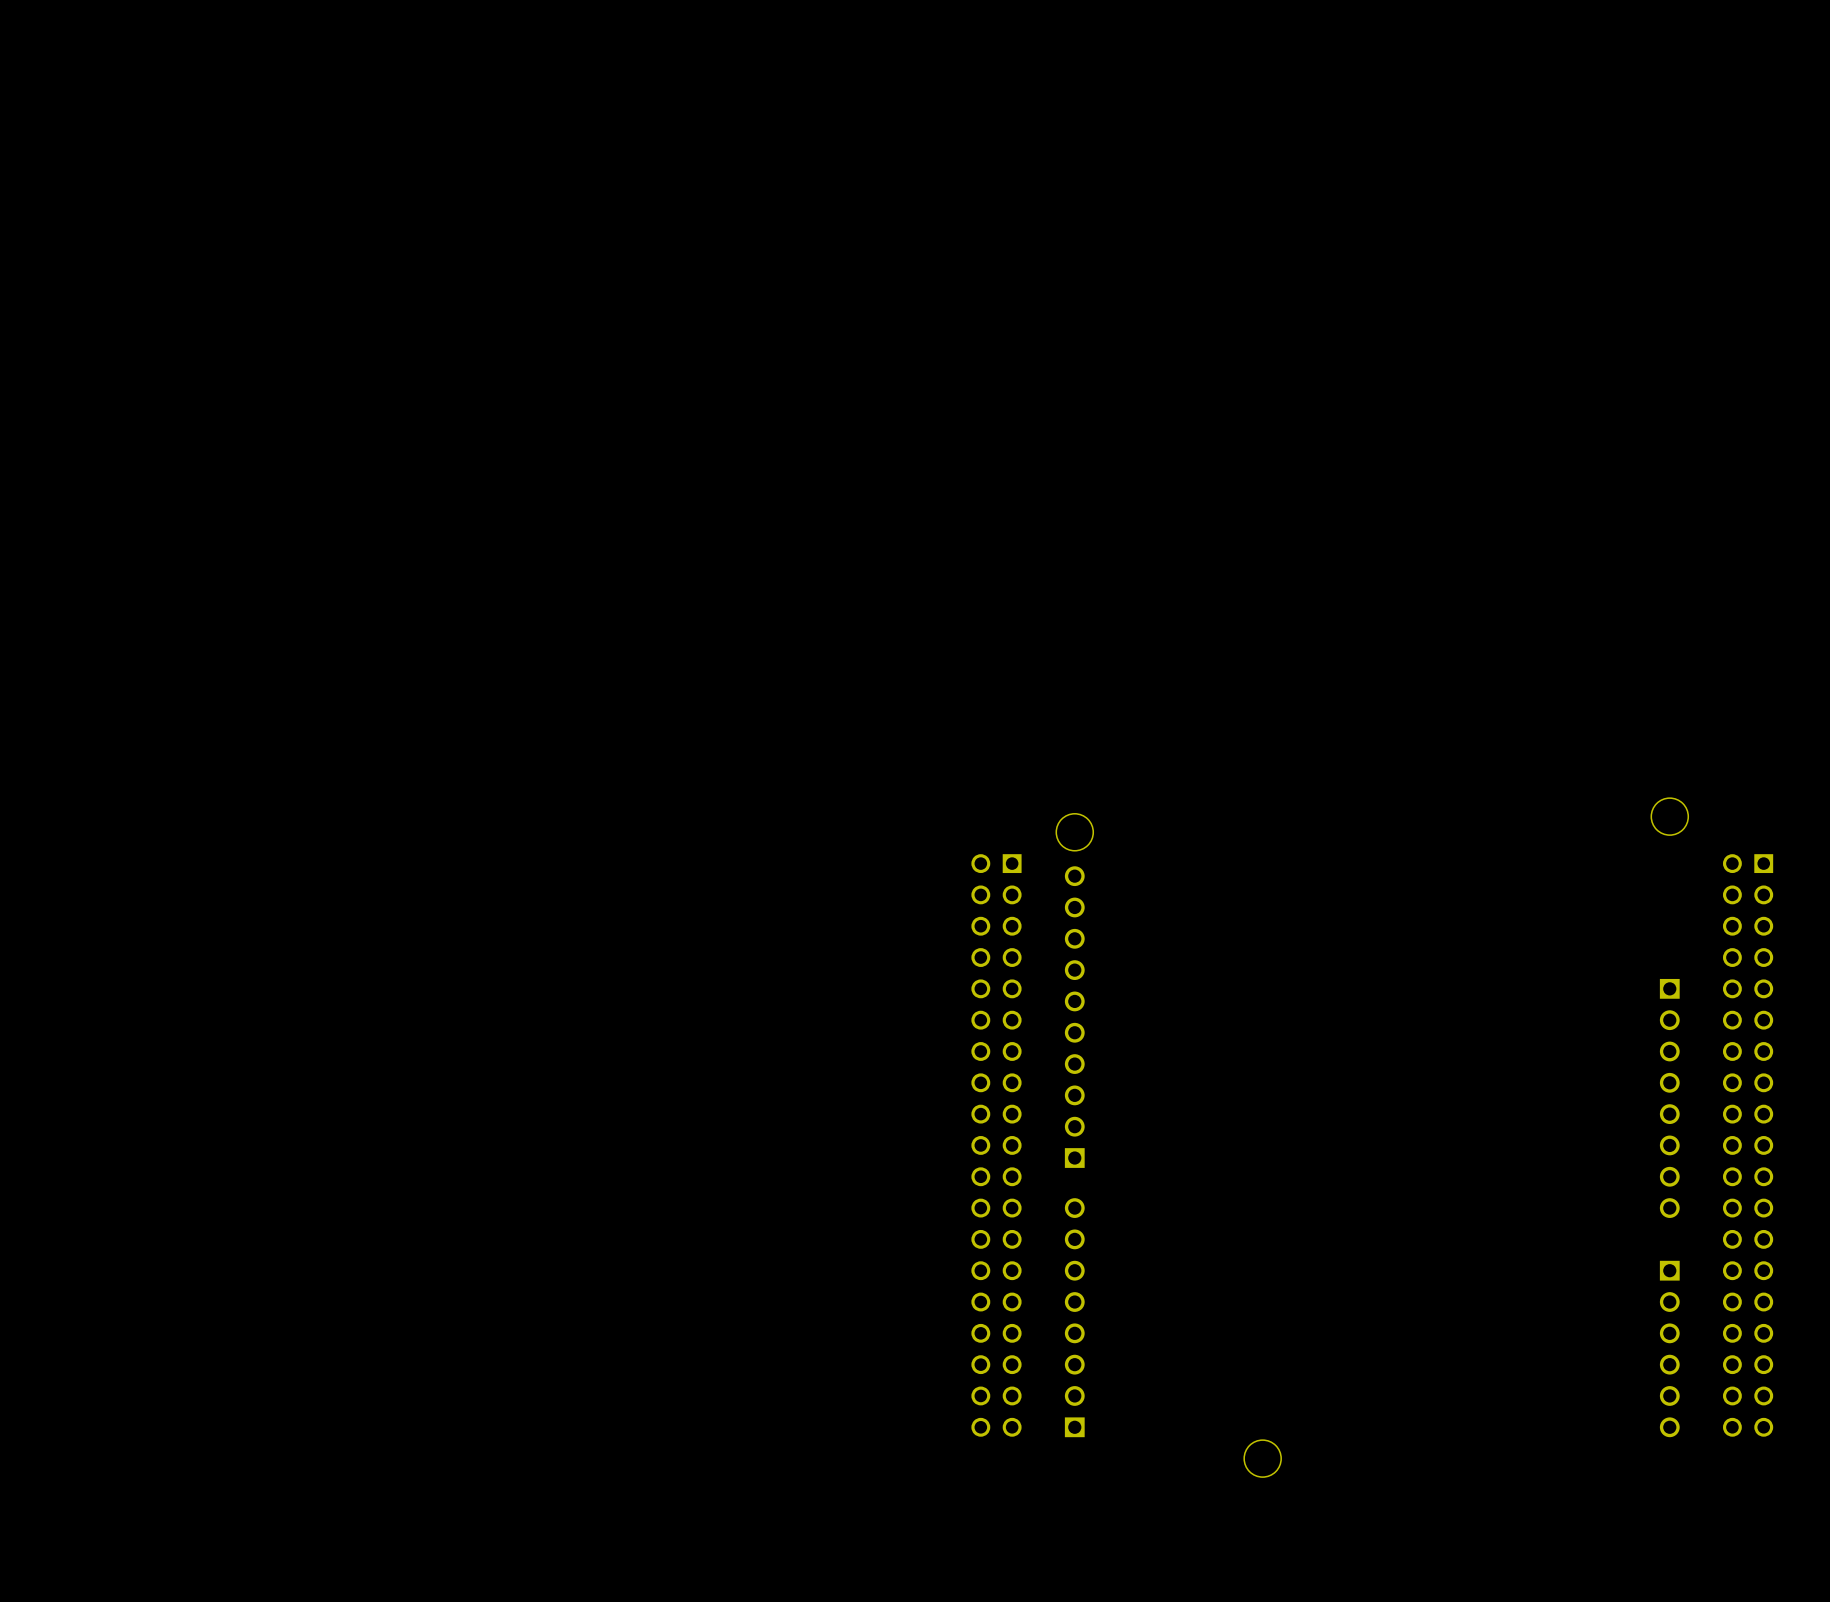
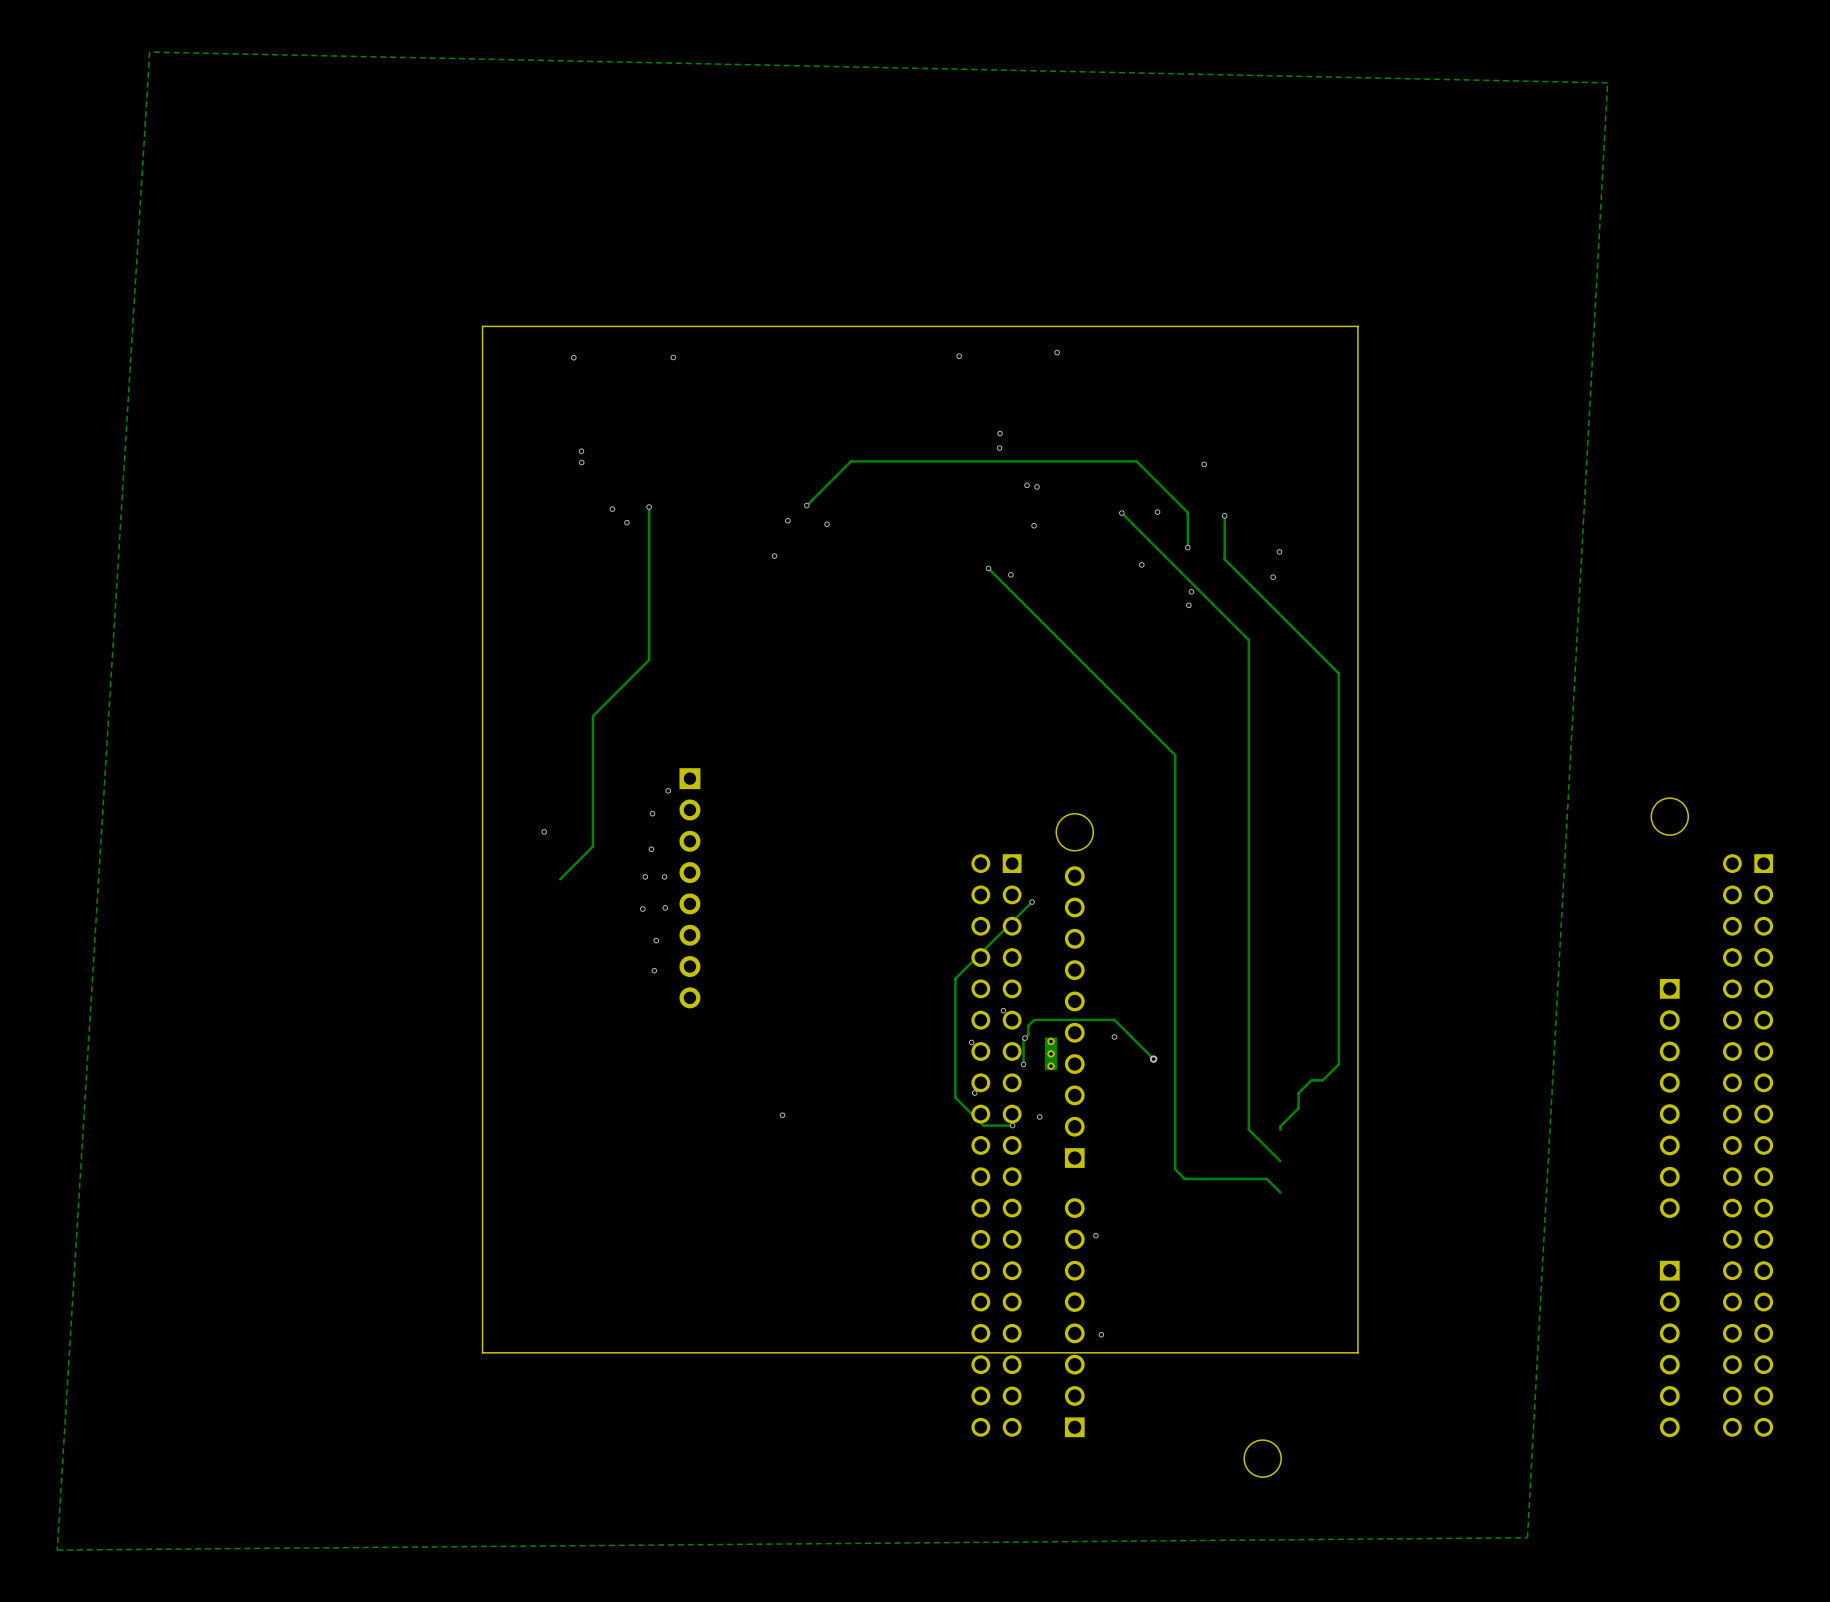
zone outline: none -> (149, 52) (1607, 82) (1527, 1537) (57, 1550) (149, 52)
board edge: none -> (1357, 326) (482, 326) (482, 1352) (1357, 1352) (1357, 326)
via: none -> (1057, 352)
via: none -> (959, 356)
via: none -> (573, 357)
via: none -> (673, 357)
via: none -> (1000, 433)
via: none -> (999, 448)
via: none -> (581, 451)
via: none -> (581, 462)
via: none -> (1204, 464)
via: none -> (1027, 485)
via: none -> (1037, 486)
track: none -> (806, 505) (850, 461) (1136, 461) (1187, 512) (1187, 547)
via: none -> (806, 505)
track: none -> (649, 507) (649, 660) (592, 716) (592, 846) (560, 879)
via: none -> (649, 507)
via: none -> (612, 509)
via: none -> (1157, 512)
track: none -> (1121, 513) (1248, 640) (1248, 1129) (1280, 1161)
via: none -> (1121, 513)
track: none -> (1224, 515) (1224, 559) (1338, 673) (1338, 1064) (1322, 1080) (1317, 1080)
via: none -> (1224, 515)
via: none -> (787, 520)
via: none -> (626, 522)
via: none -> (827, 524)
via: none -> (1034, 525)
via: none -> (1187, 547)
via: none -> (1279, 551)
via: none -> (774, 556)
via: none -> (1141, 564)
track: none -> (988, 568) (1175, 755) (1175, 1169) (1184, 1178)
via: none -> (988, 568)
via: none -> (1010, 574)
via: none -> (1273, 577)
via: none -> (1191, 591)
via: none -> (1188, 605)
via: none -> (668, 790)
via: none -> (652, 813)
via: none -> (544, 831)
via: none -> (651, 849)
via: none -> (645, 876)
via: none -> (664, 876)
part: none -> (689, 888)
track: none -> (1032, 902) (955, 978) (955, 1097) (983, 1125) (1012, 1125)
via: none -> (1032, 902)
via: none -> (665, 907)
via: none -> (642, 909)
via: none -> (656, 940)
via: none -> (654, 970)
via: none -> (1003, 1010)
via: none -> (1114, 1036)
via: none -> (1025, 1038)
via: none -> (971, 1042)
part: none -> (1051, 1053)
track: none -> (1153, 1059) (1114, 1019) (1034, 1019) (1028, 1025) (1028, 1034) (1023, 1039) (1023, 1064)
via: none -> (1153, 1059)
via: none -> (1023, 1064)
track: none -> (1317, 1080) (1311, 1080) (1298, 1093) (1298, 1108) (1280, 1126) (1280, 1129)
via: none -> (974, 1093)
via: none -> (782, 1115)
via: none -> (1039, 1116)
via: none -> (1012, 1125)
track: none -> (1184, 1178) (1266, 1178) (1280, 1192)
via: none -> (1095, 1235)
via: none -> (1101, 1334)

